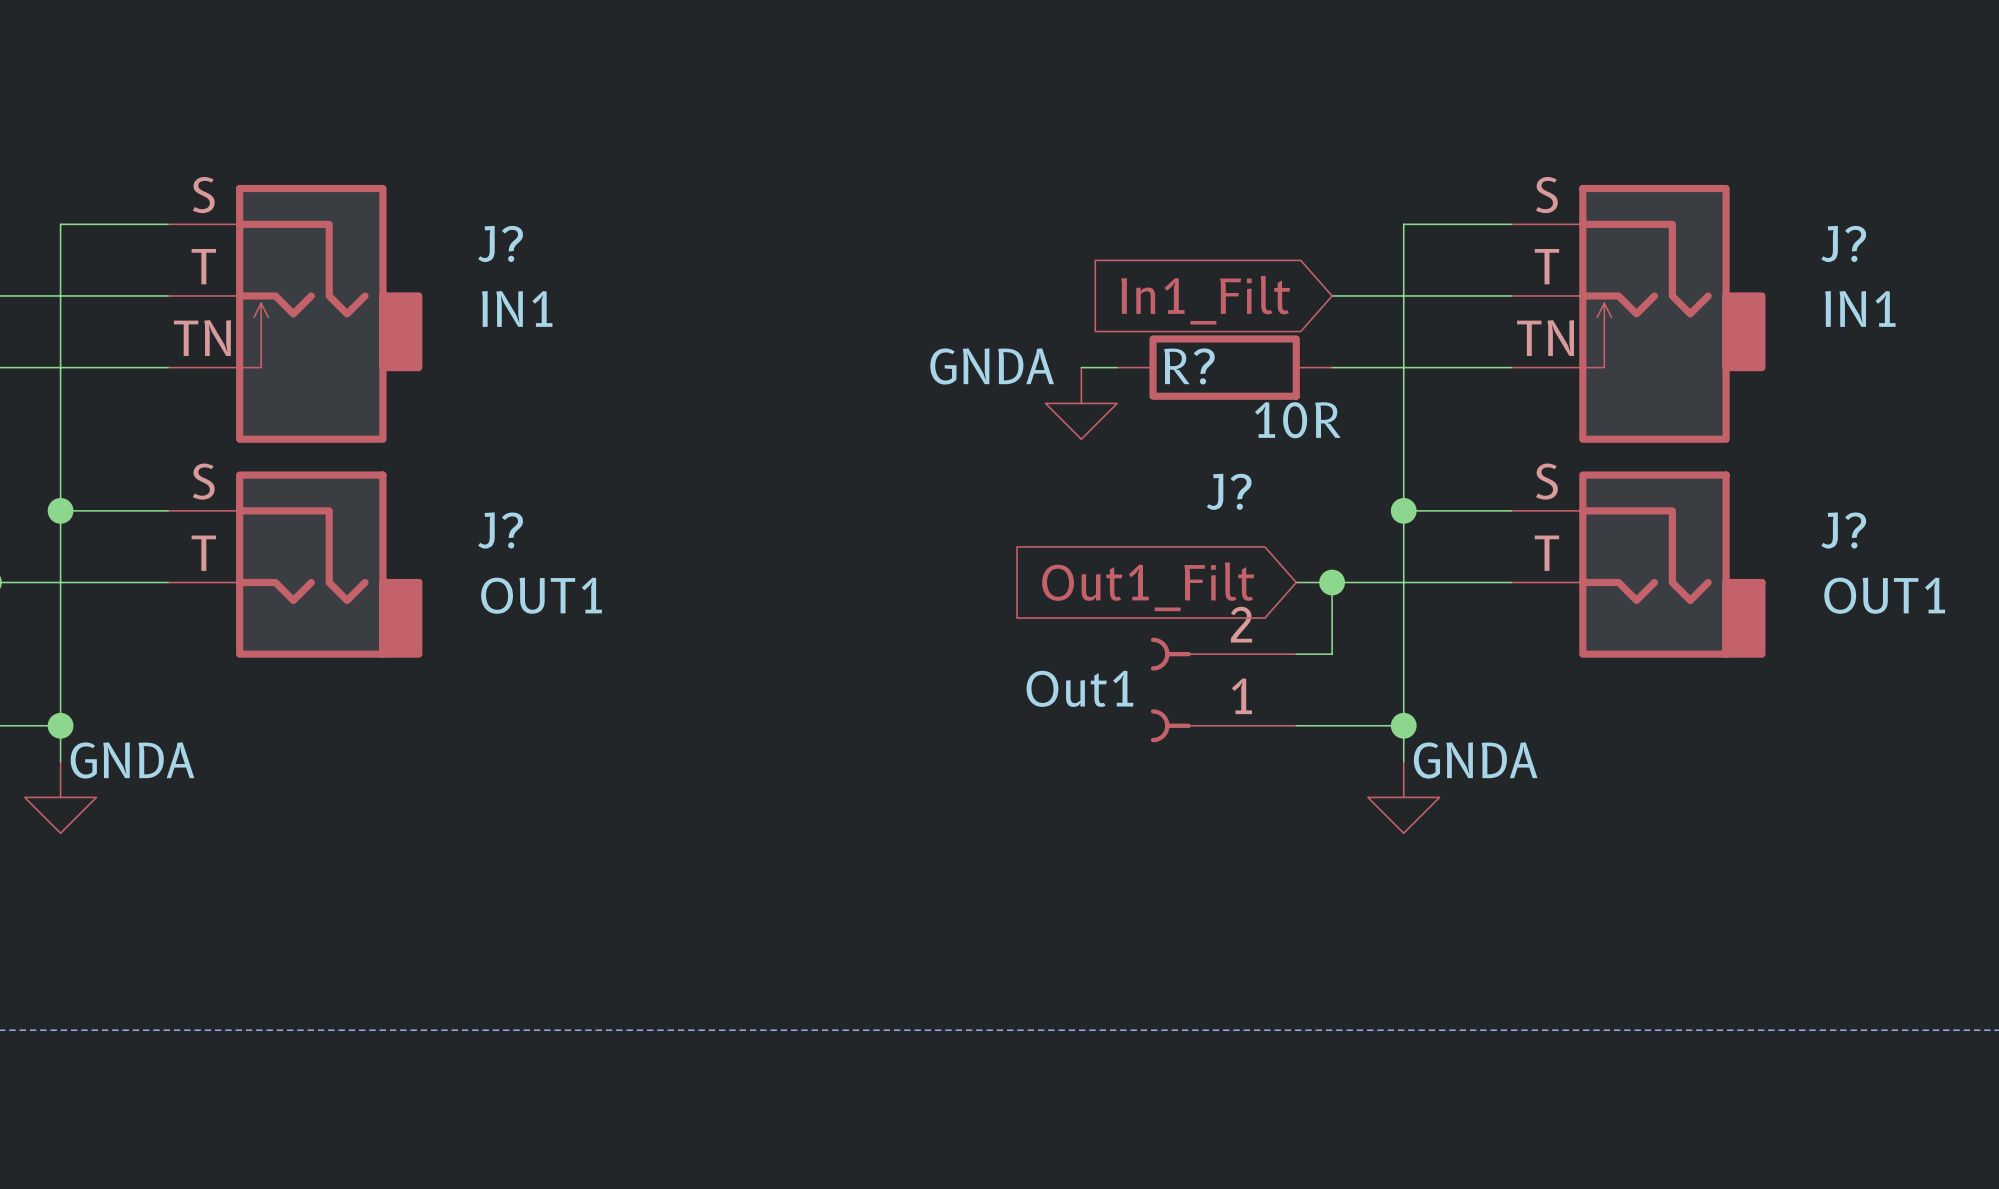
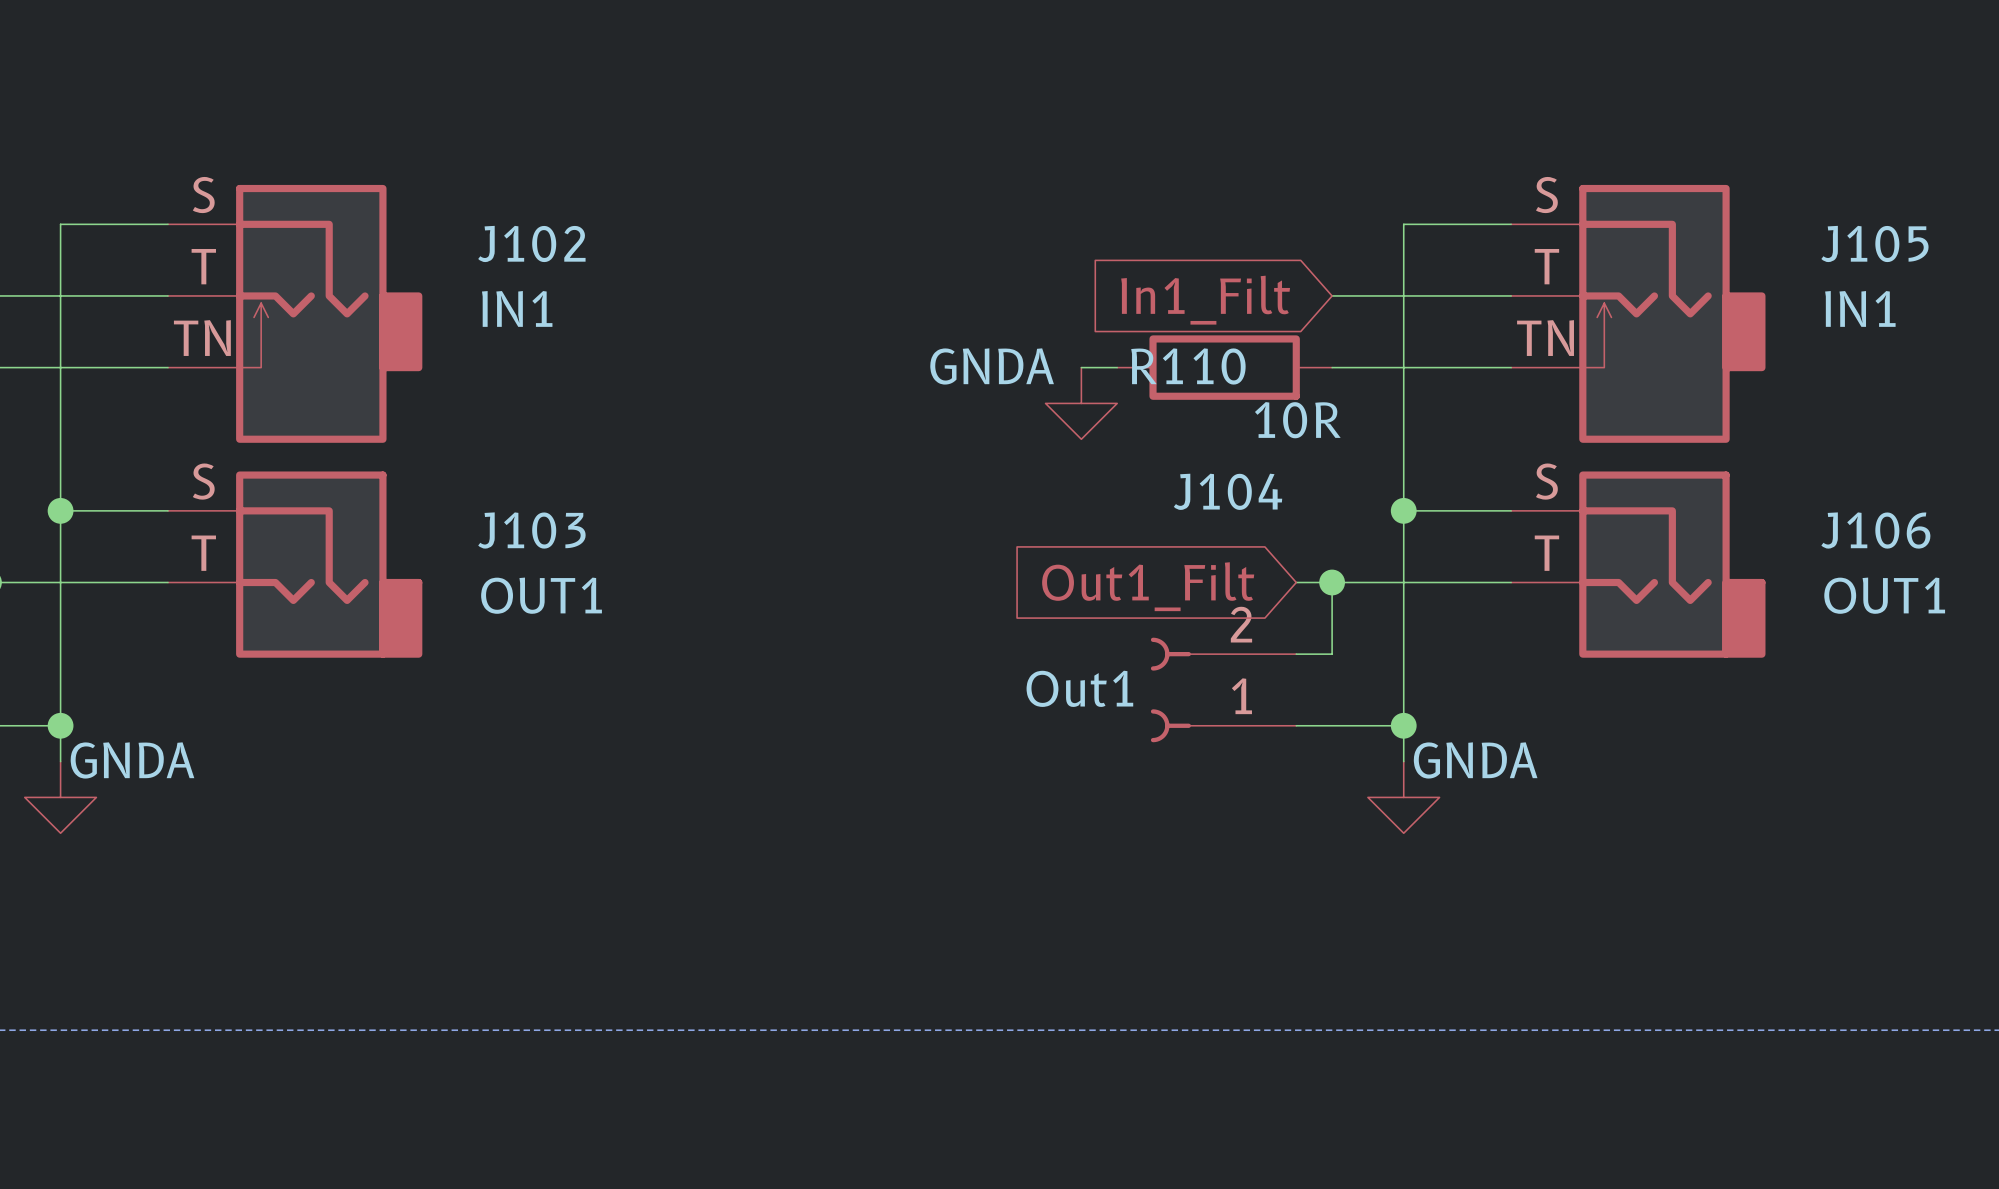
J? name: J? (500, 243) -> J102 (531, 243)
J? name: J? (1843, 243) -> J105 (1874, 243)
R? name: R? (1189, 366) -> R110 (1188, 366)
J? name: J? (1229, 491) -> J104 (1228, 491)
J? name: J? (500, 530) -> J103 (531, 530)
J? name: J? (1843, 530) -> J106 (1875, 530)

